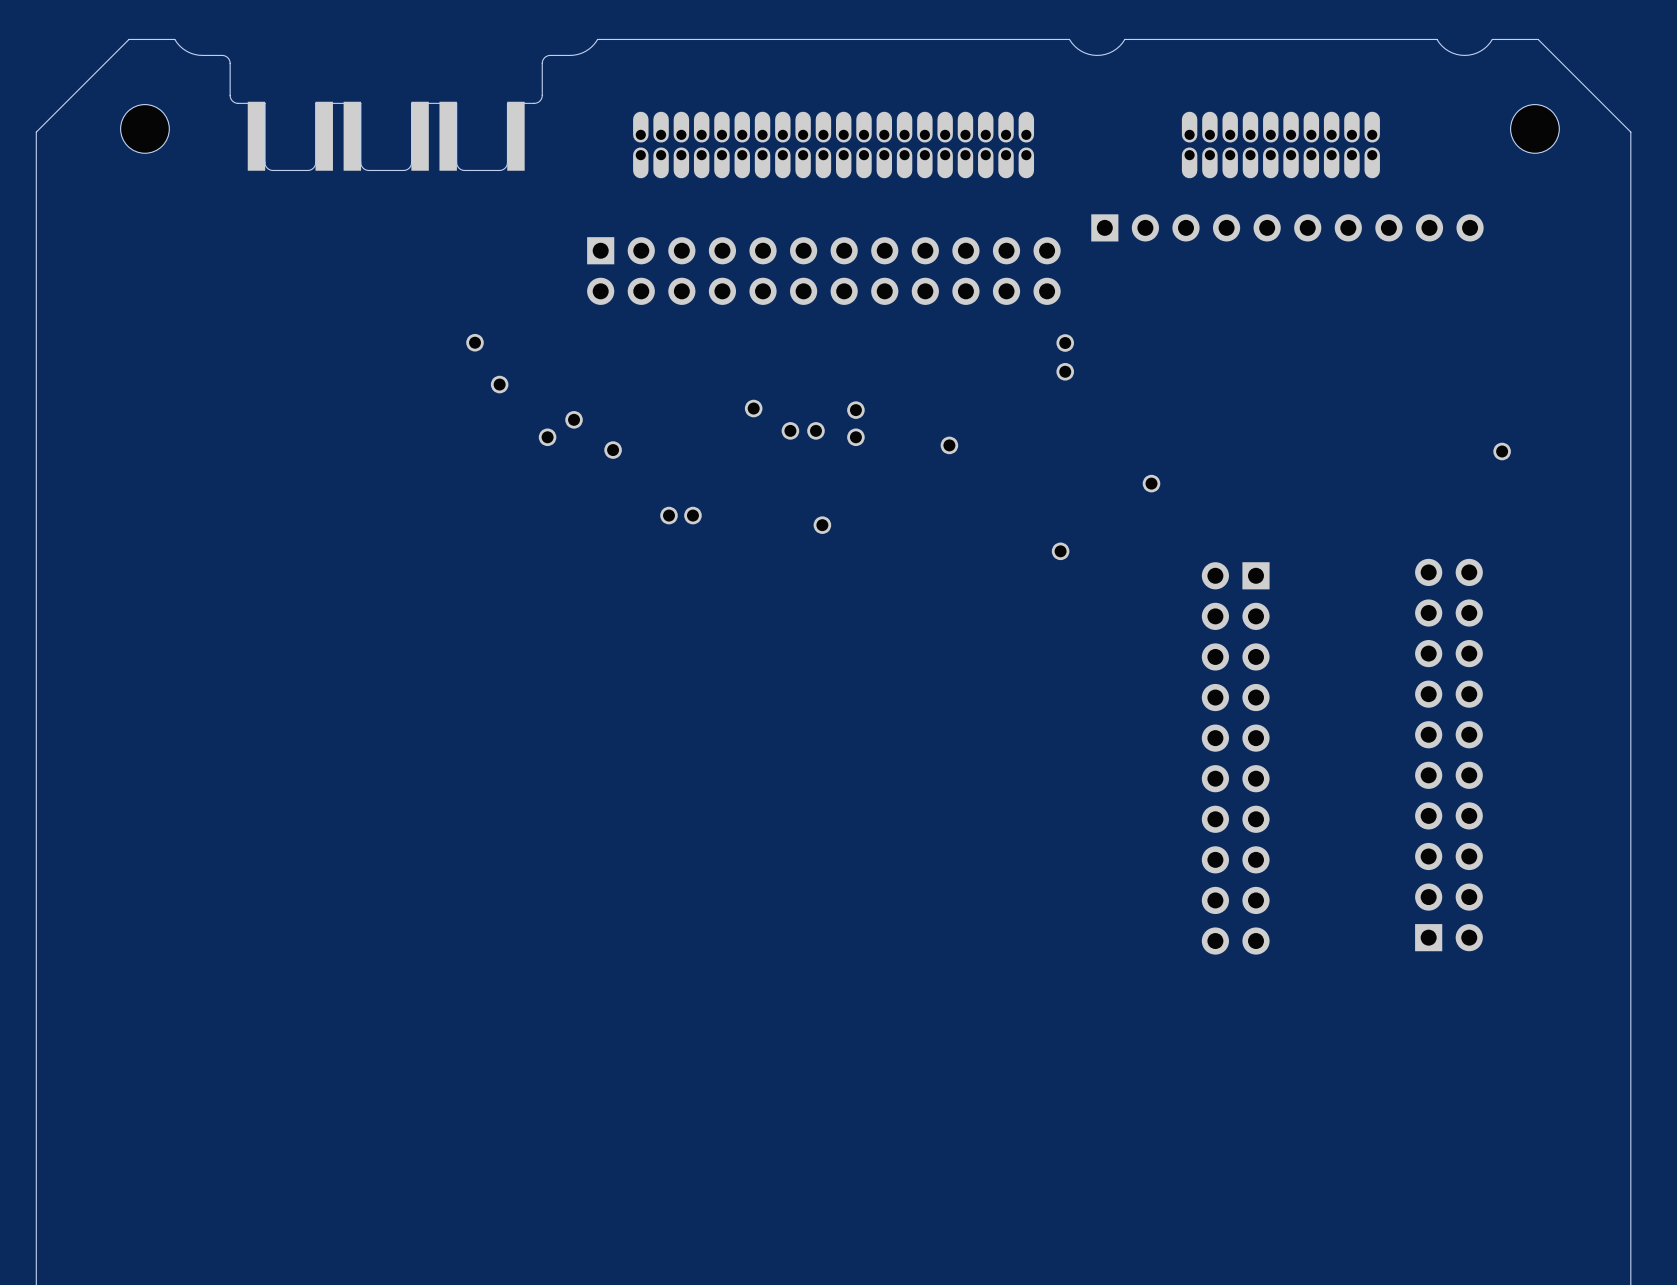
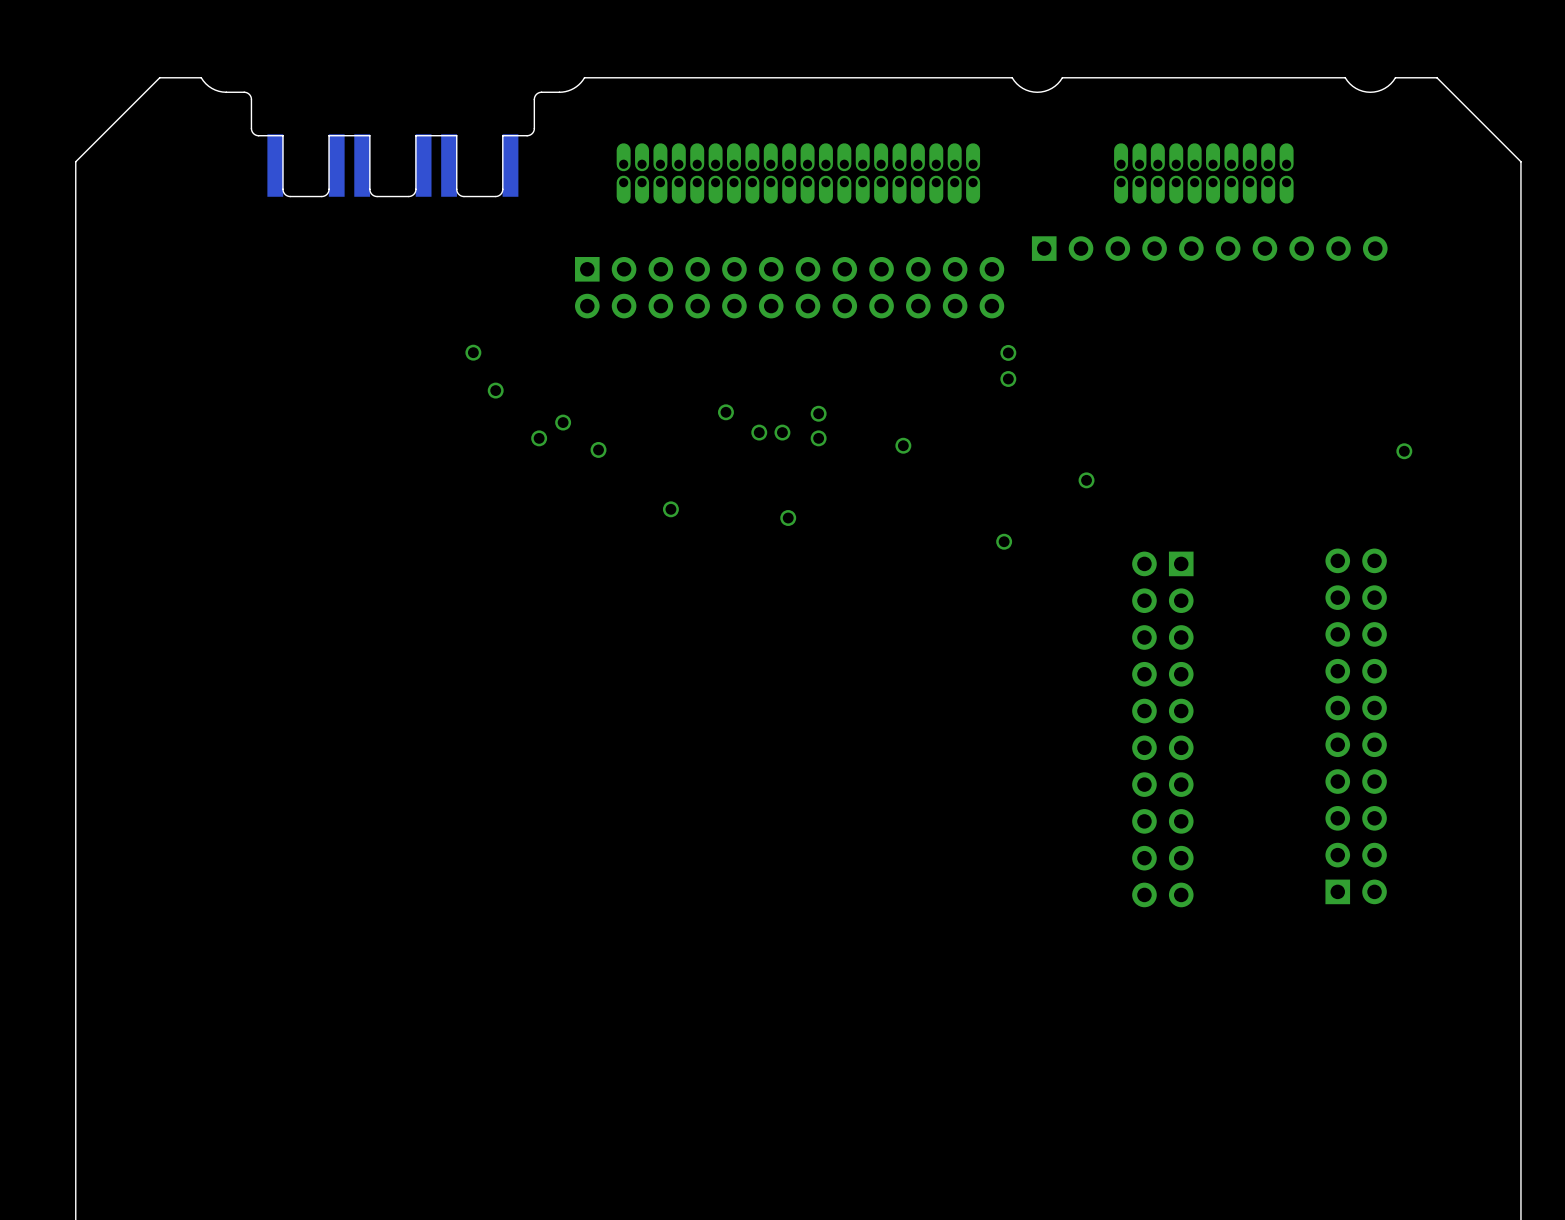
part: (144, 128) -> none
part: (1534, 128) -> none
part: (669, 515) -> none

